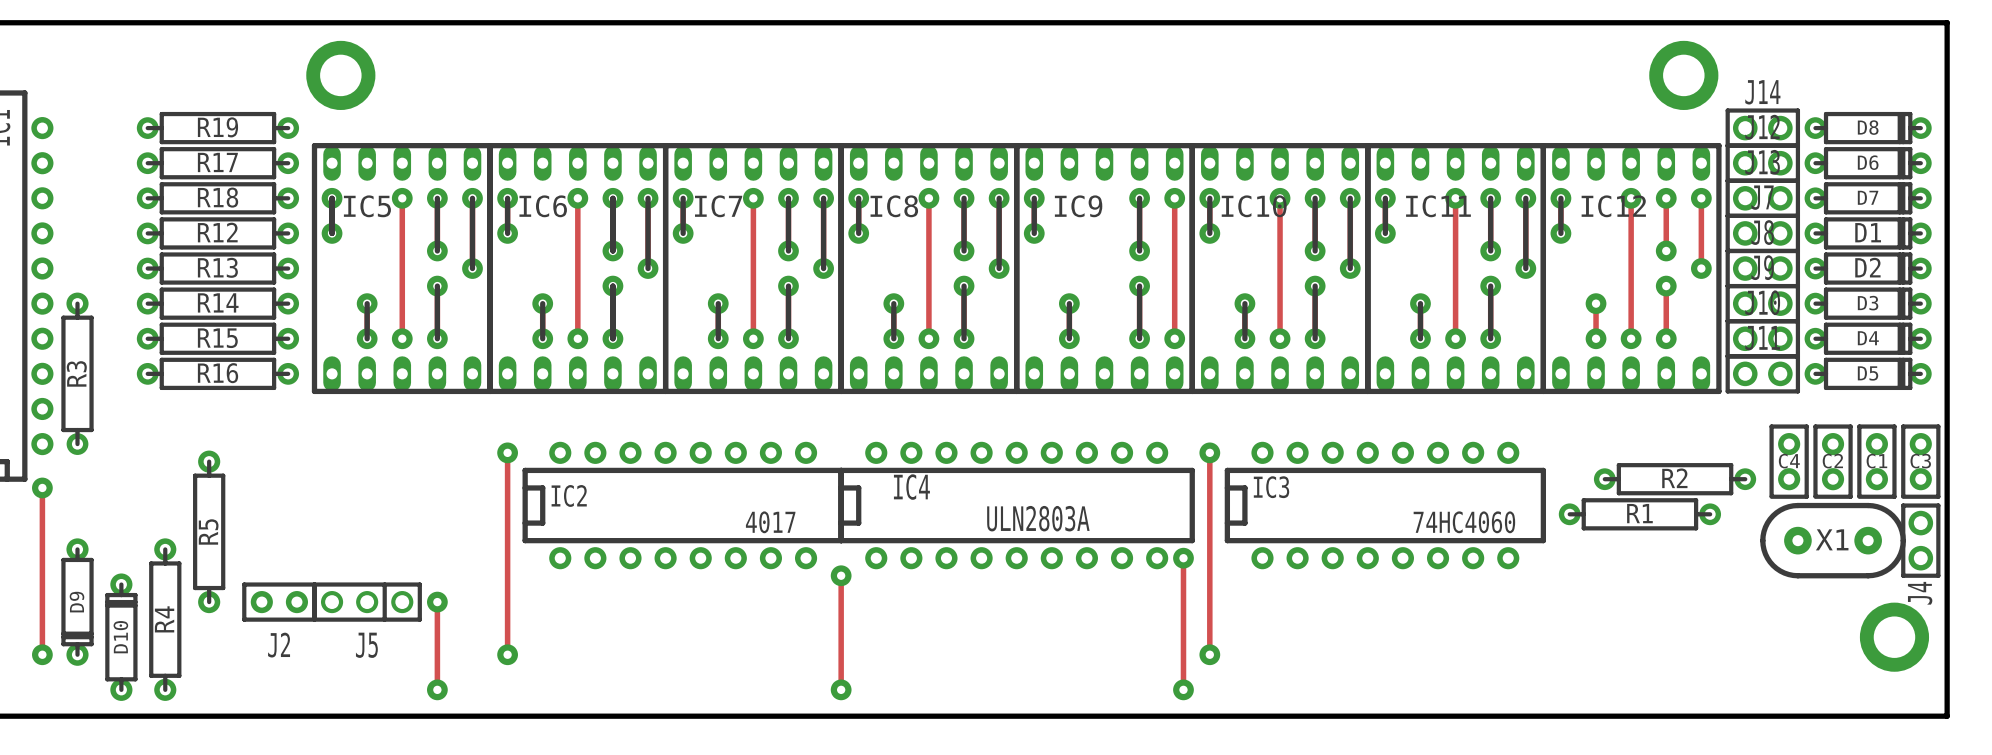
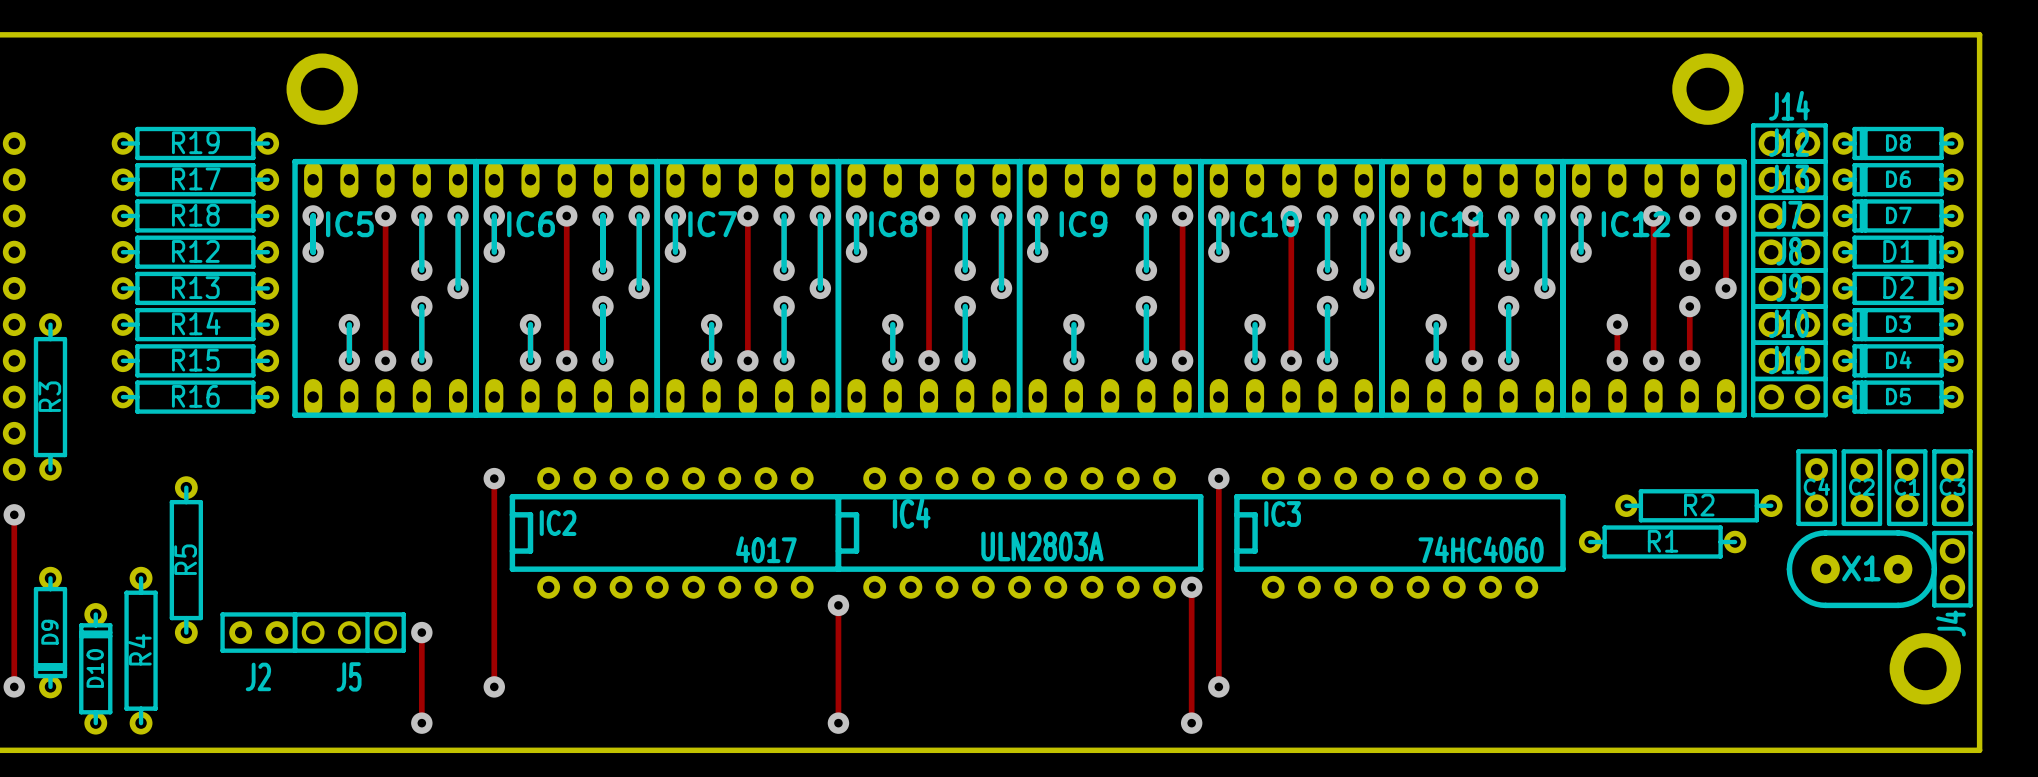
D8 rotation: 0° (1868, 128) -> 180° (1898, 143)
D6 rotation: 0° (1868, 163) -> 180° (1898, 179)
D7 rotation: 0° (1868, 198) -> 180° (1898, 215)
D3 rotation: 0° (1868, 303) -> 180° (1898, 324)
D4 rotation: 0° (1868, 338) -> 180° (1898, 360)
D5 rotation: 0° (1868, 373) -> 180° (1898, 397)

